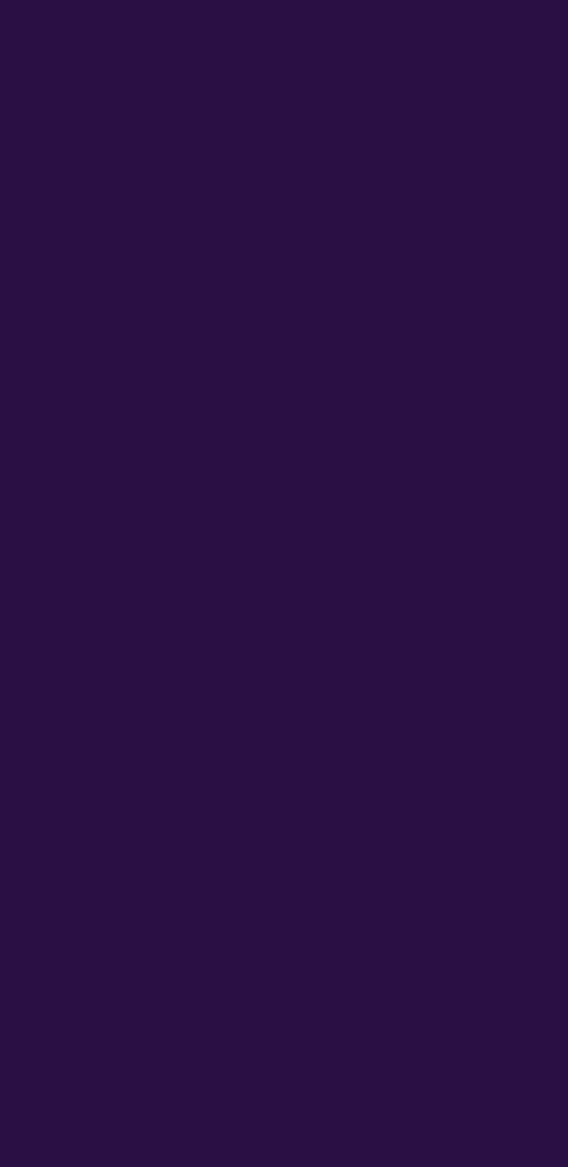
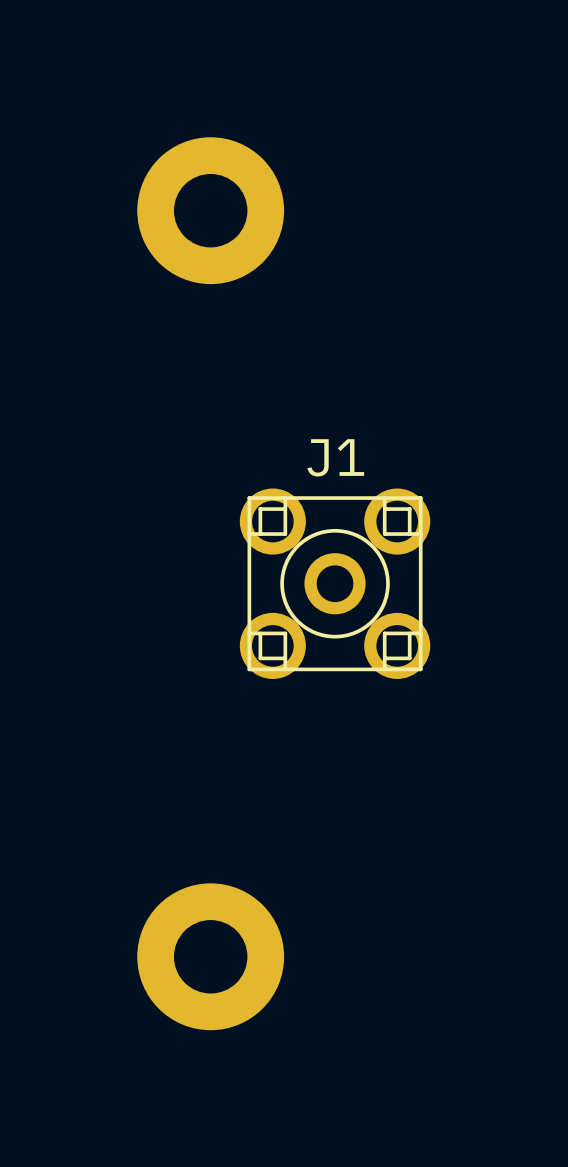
part: none -> (210, 210)
J1: none -> (335, 583)
part: none -> (210, 956)

